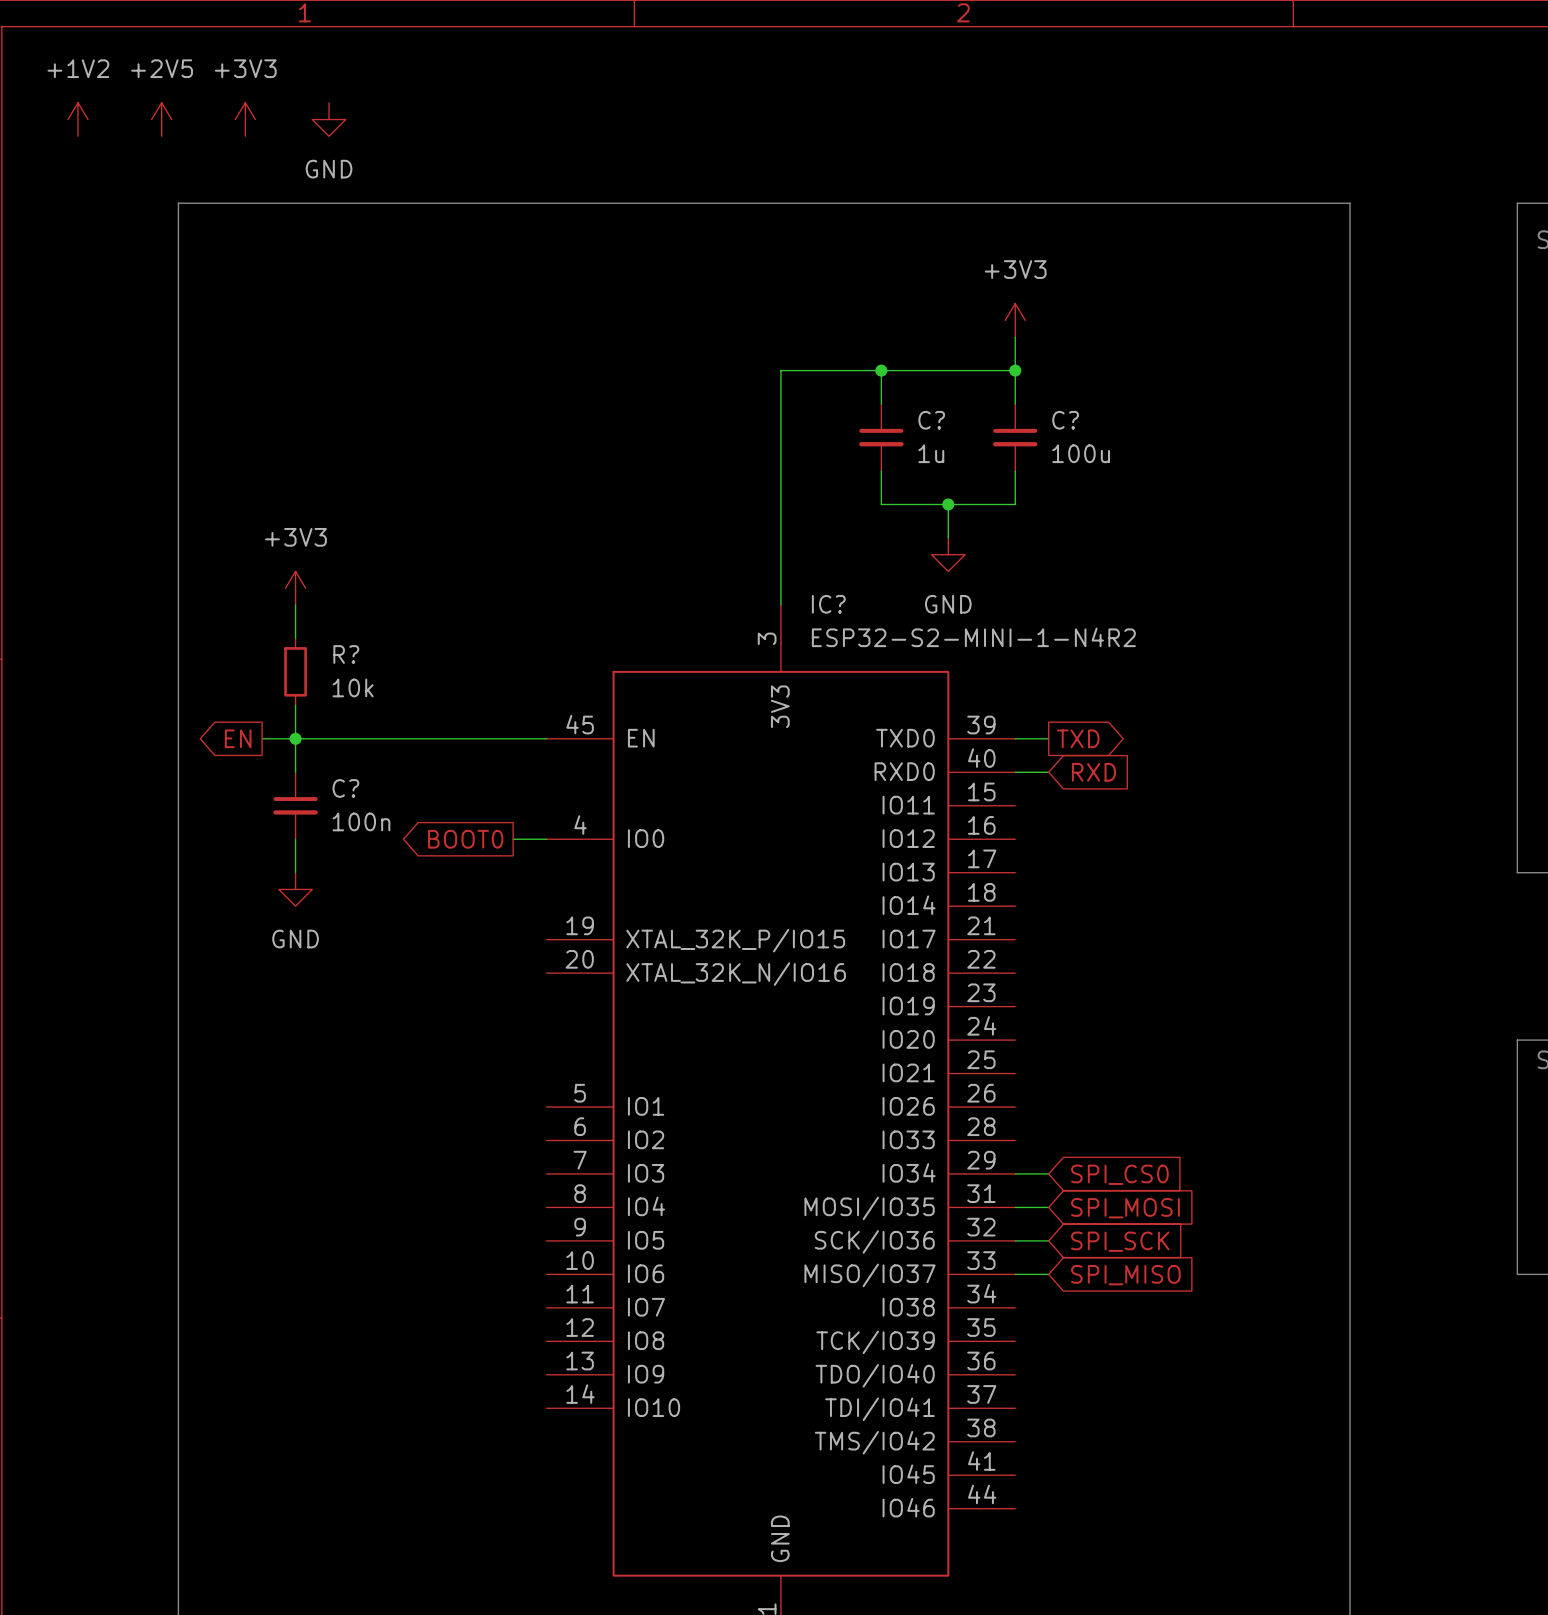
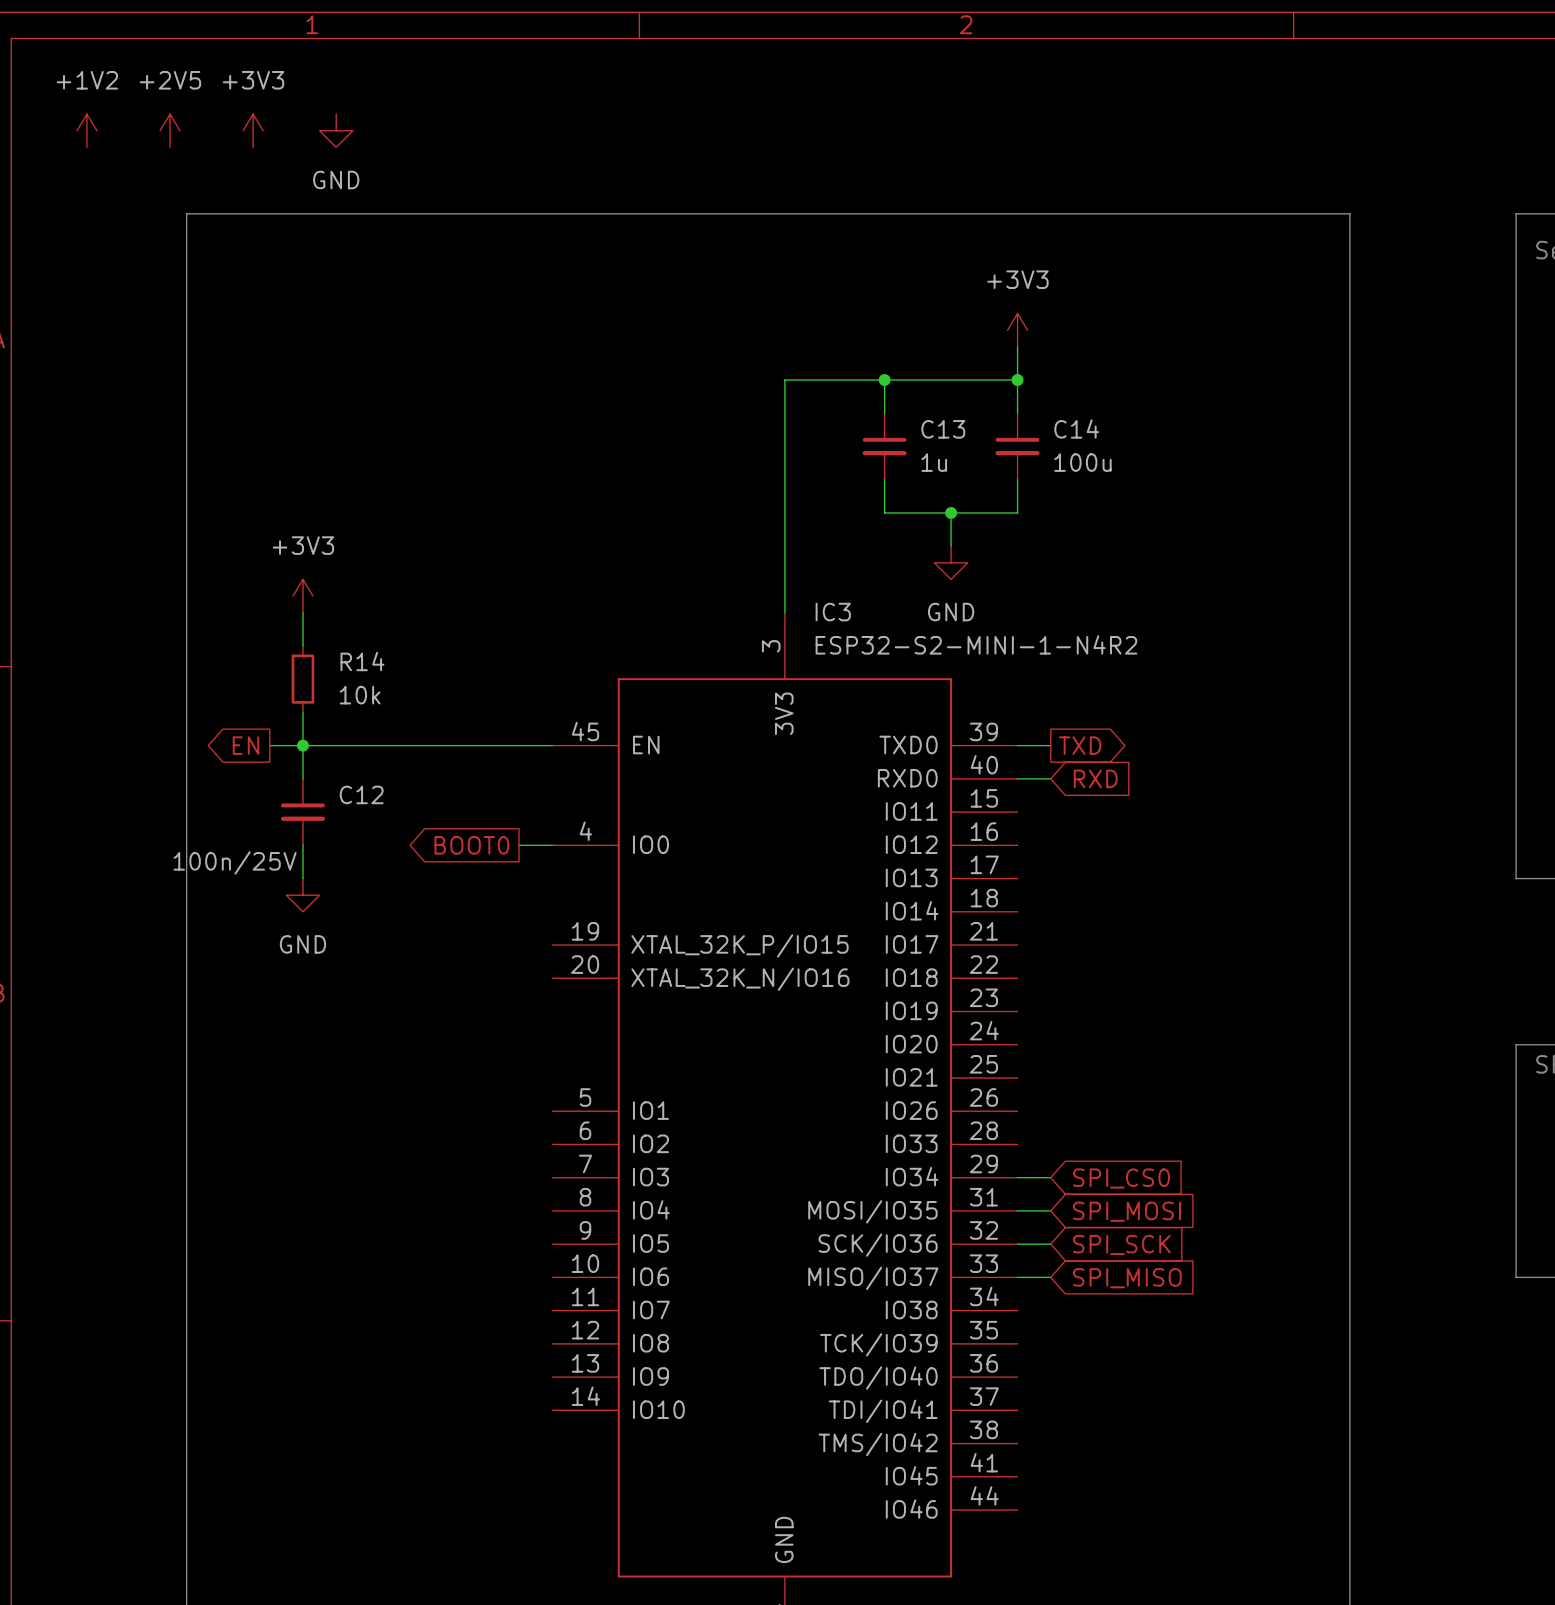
C? name: C? (931, 420) -> C13 (943, 429)
C? name: C? (1065, 420) -> C14 (1076, 428)
IC? name: IC? (828, 604) -> IC3 (833, 612)
R? name: R? (346, 654) -> R14 (362, 661)
C? name: C? (345, 788) -> C12 (361, 794)
C? value: 100n (361, 821) -> 100n/25V (235, 862)

